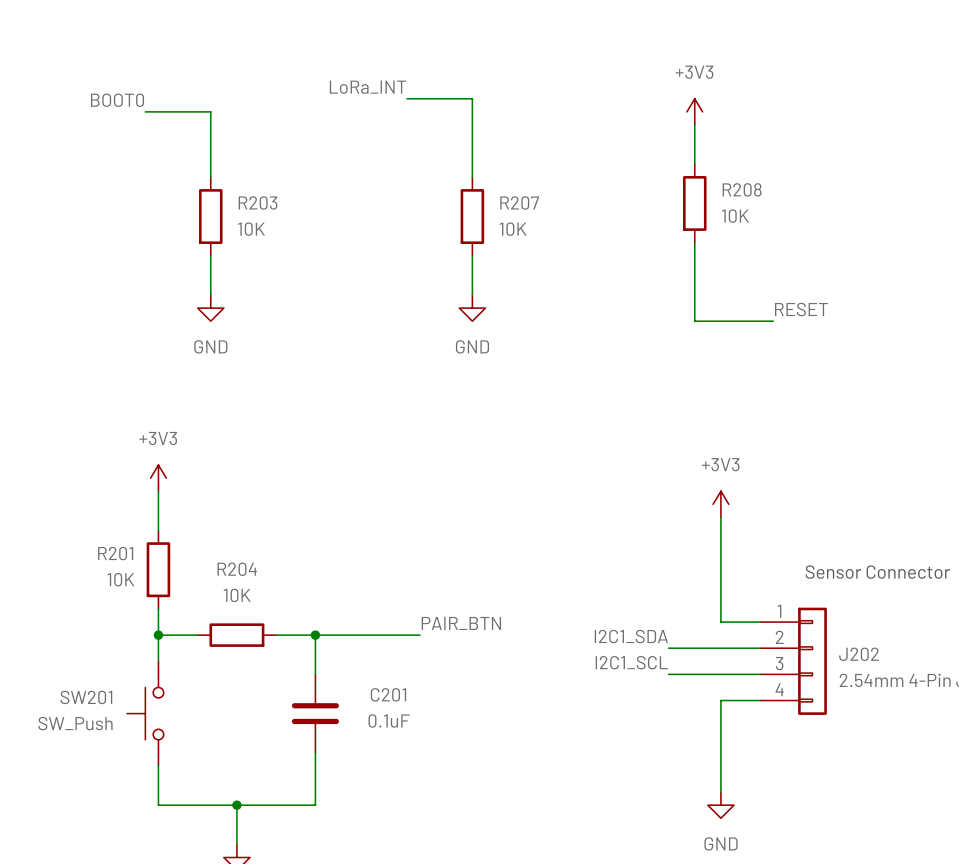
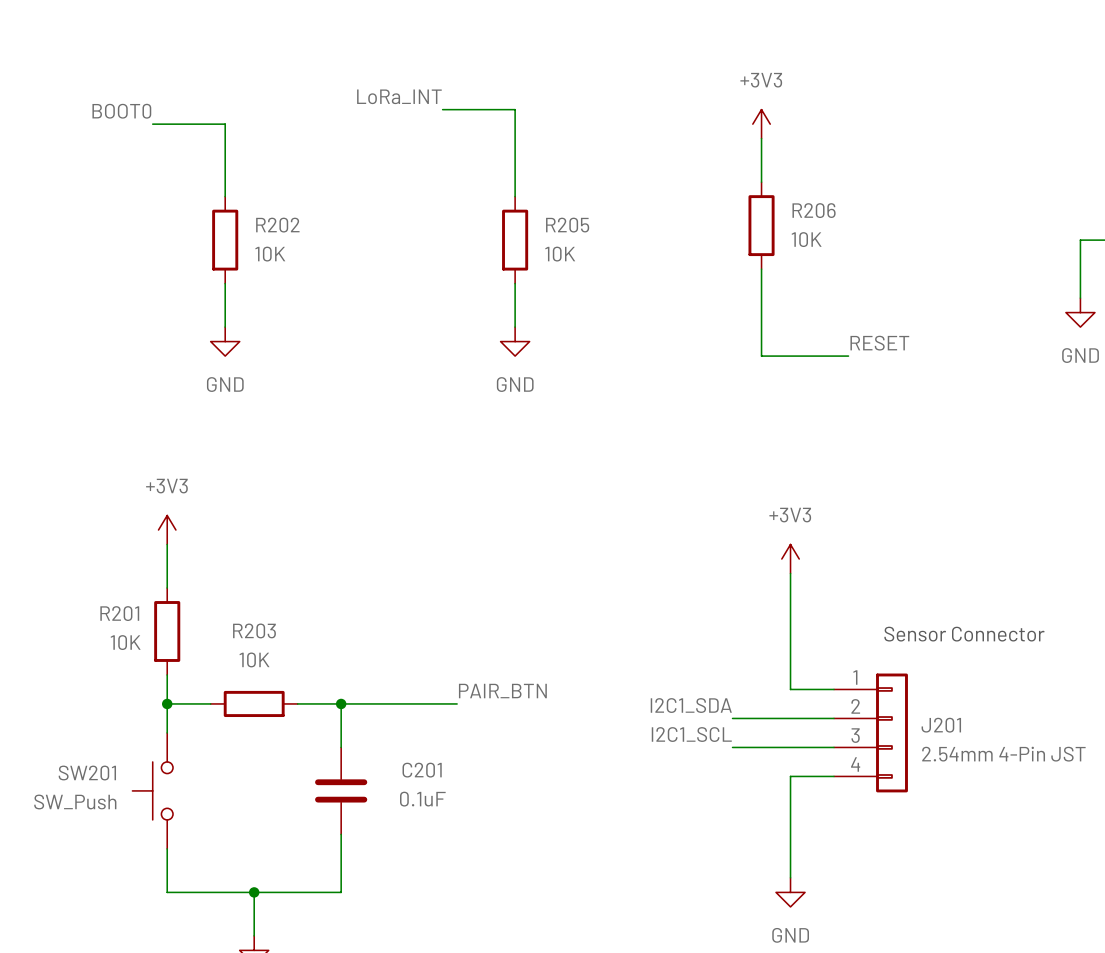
R208 name: R208 (742, 189) -> R206 (814, 210)
R203 name: R203 (258, 202) -> R202 (277, 225)
R207 name: R207 (519, 202) -> R205 (567, 225)
R204 name: R204 (237, 569) -> R203 (254, 630)
J202 name: J202 (859, 654) -> J201 (941, 725)

